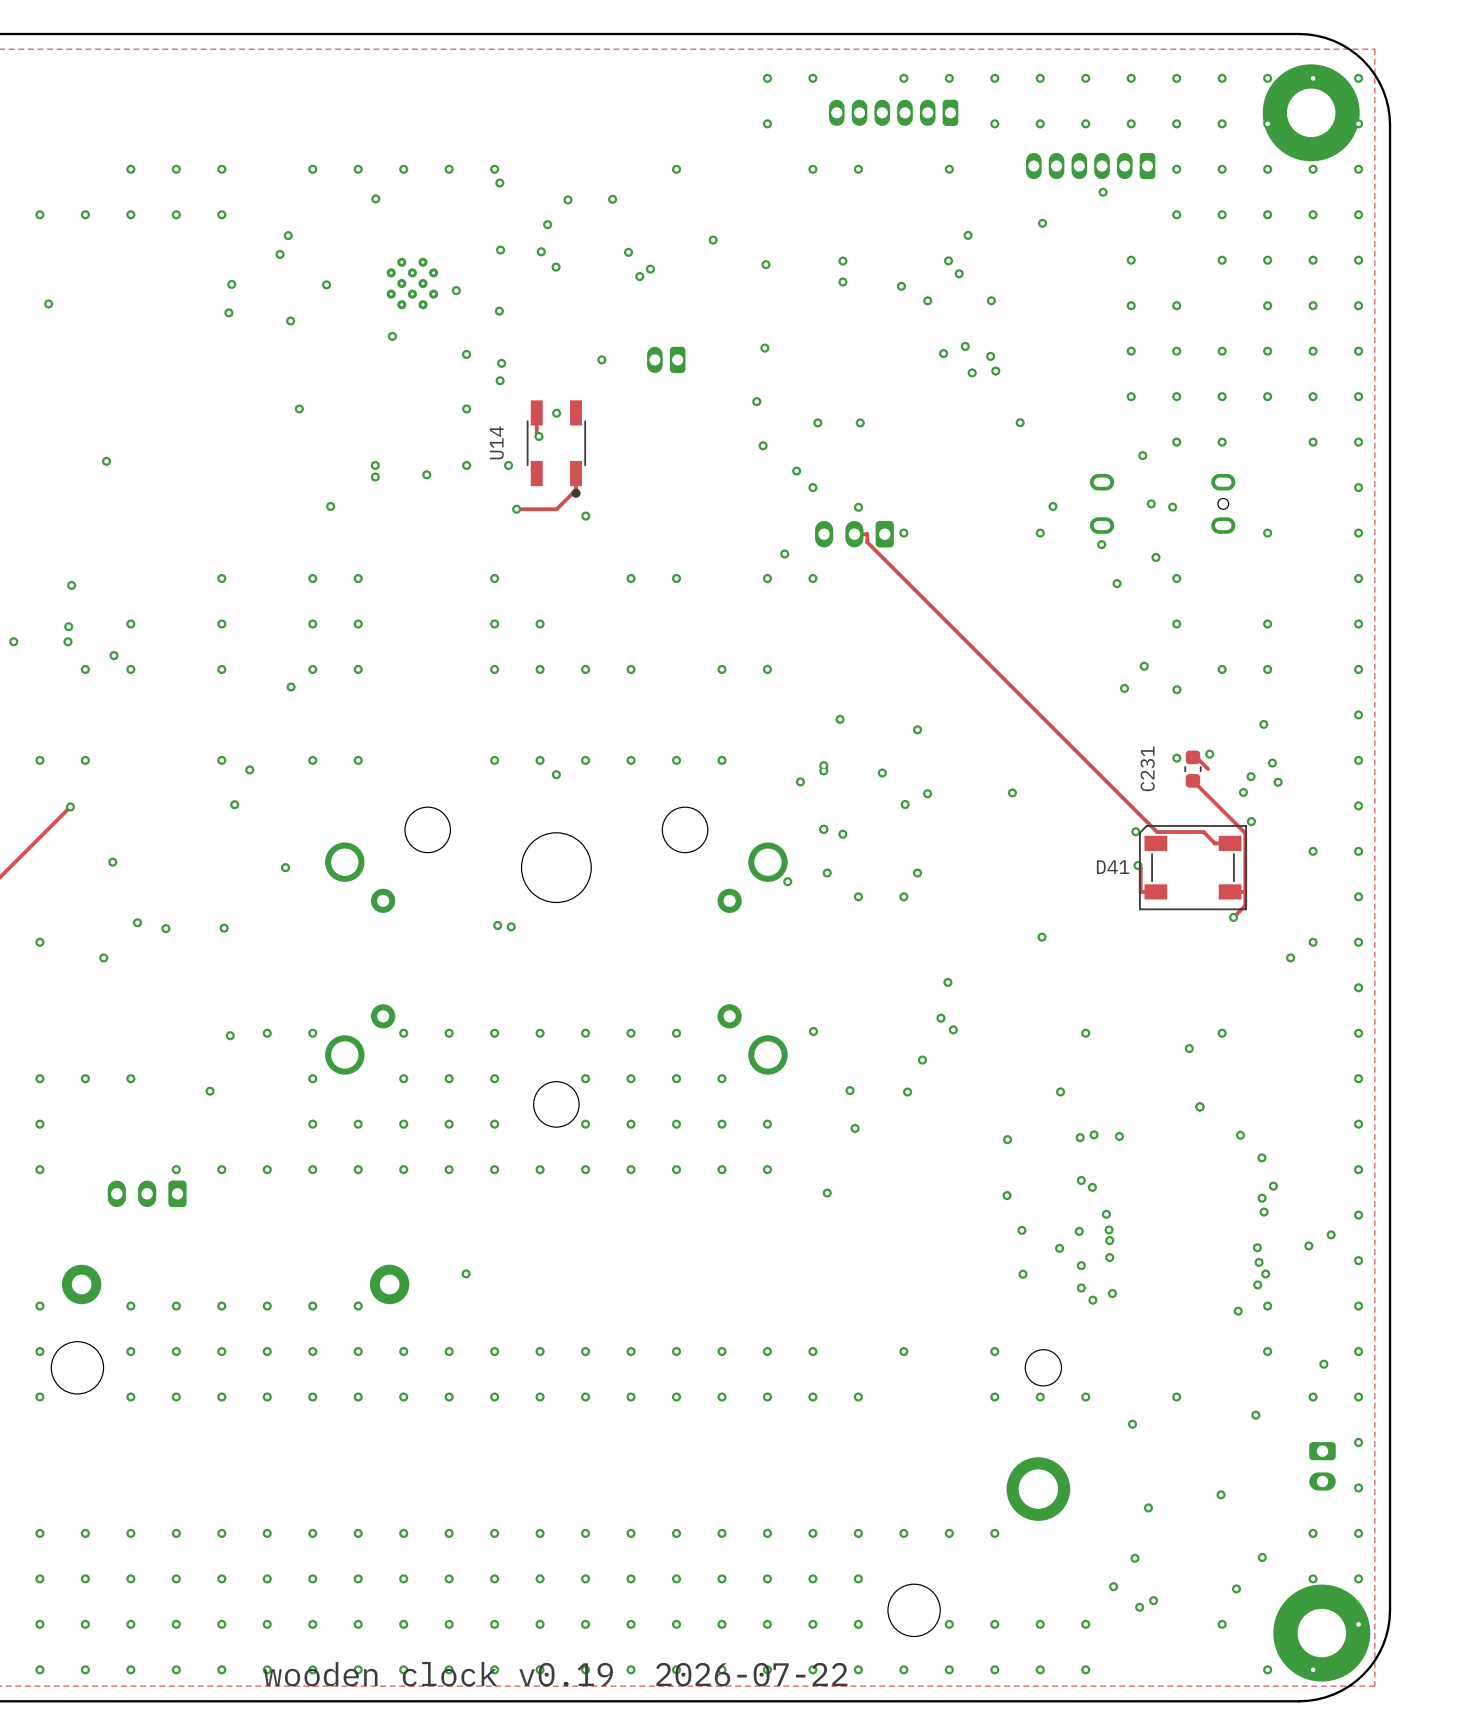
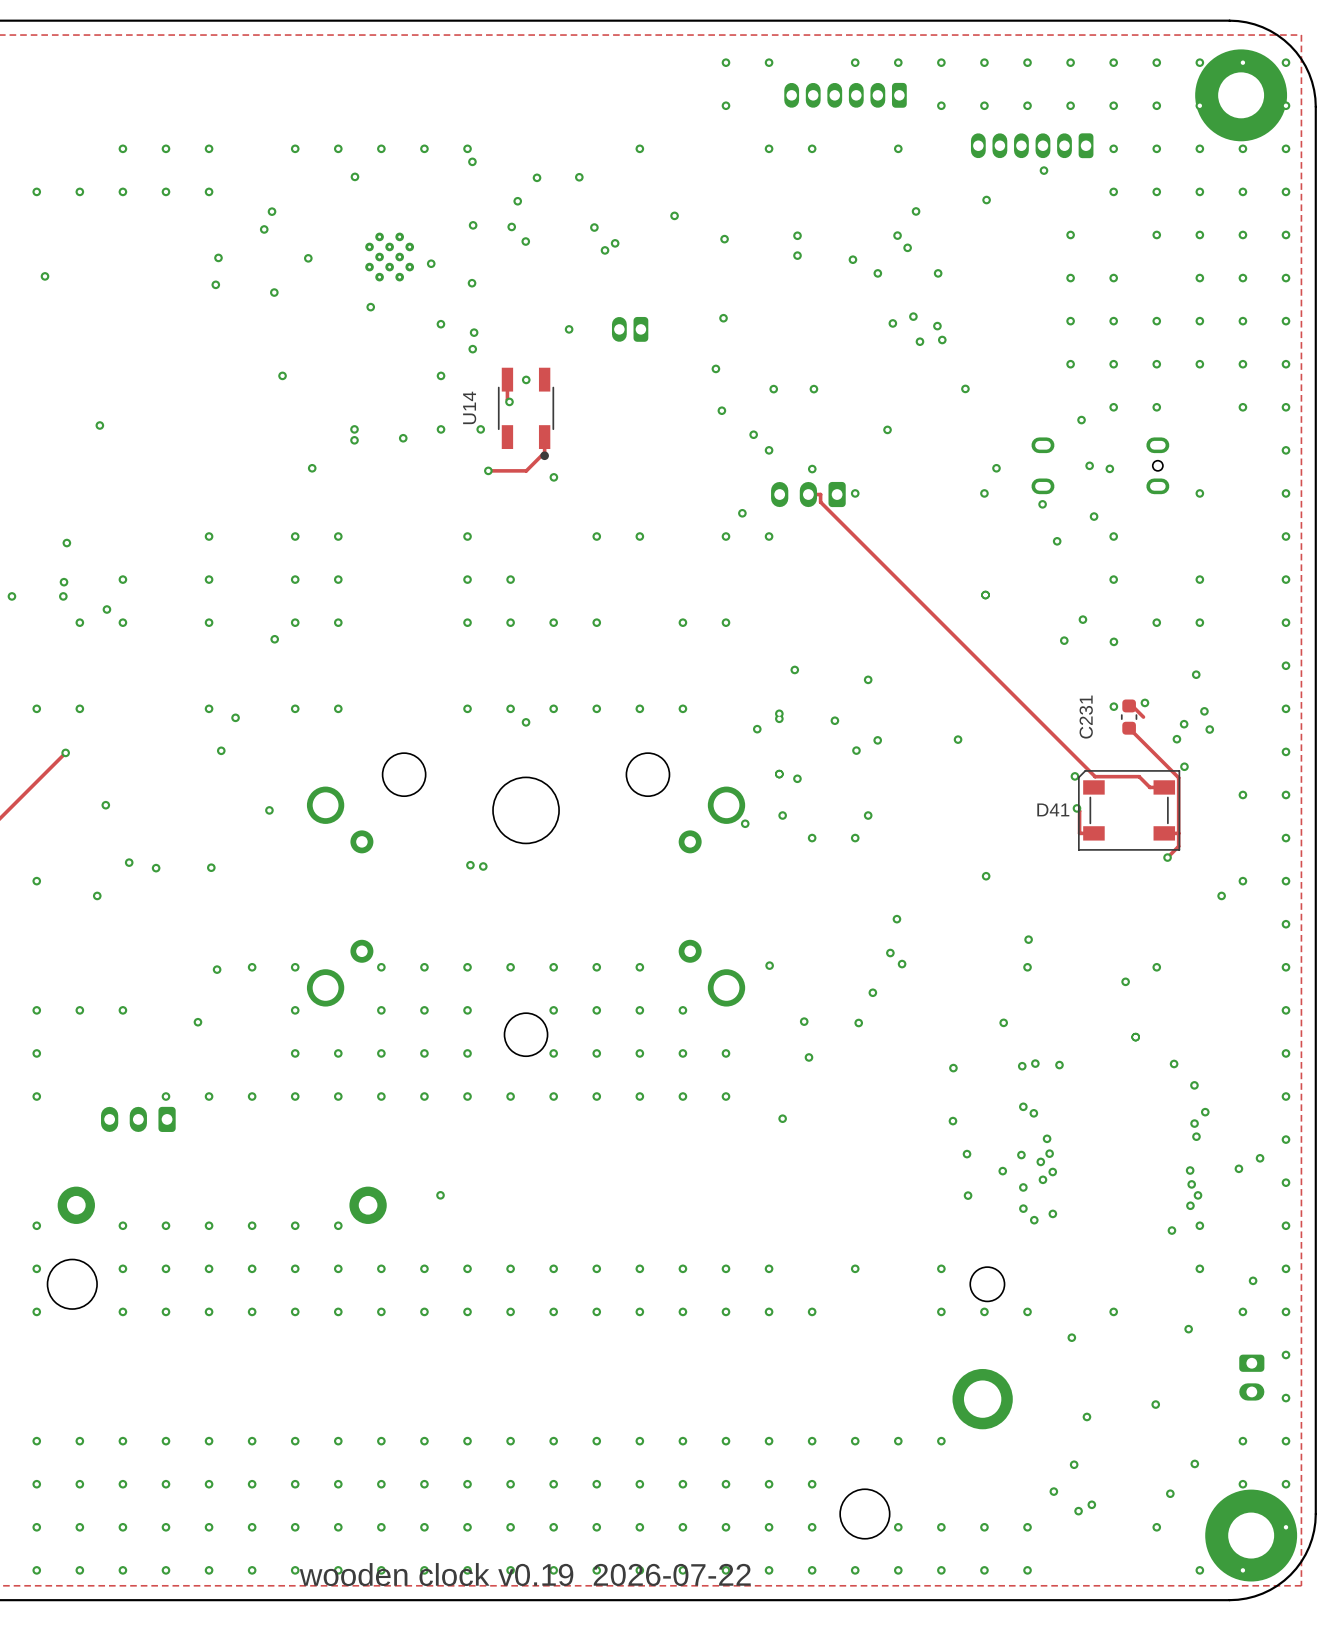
via: none -> (887, 429)
via: none -> (985, 595)
via: none -> (1028, 939)
via: none -> (1040, 1161)
via: (1109, 1240) -> none
via: none -> (1052, 1172)
via: none -> (1042, 1179)
via: (1109, 1257) -> none

